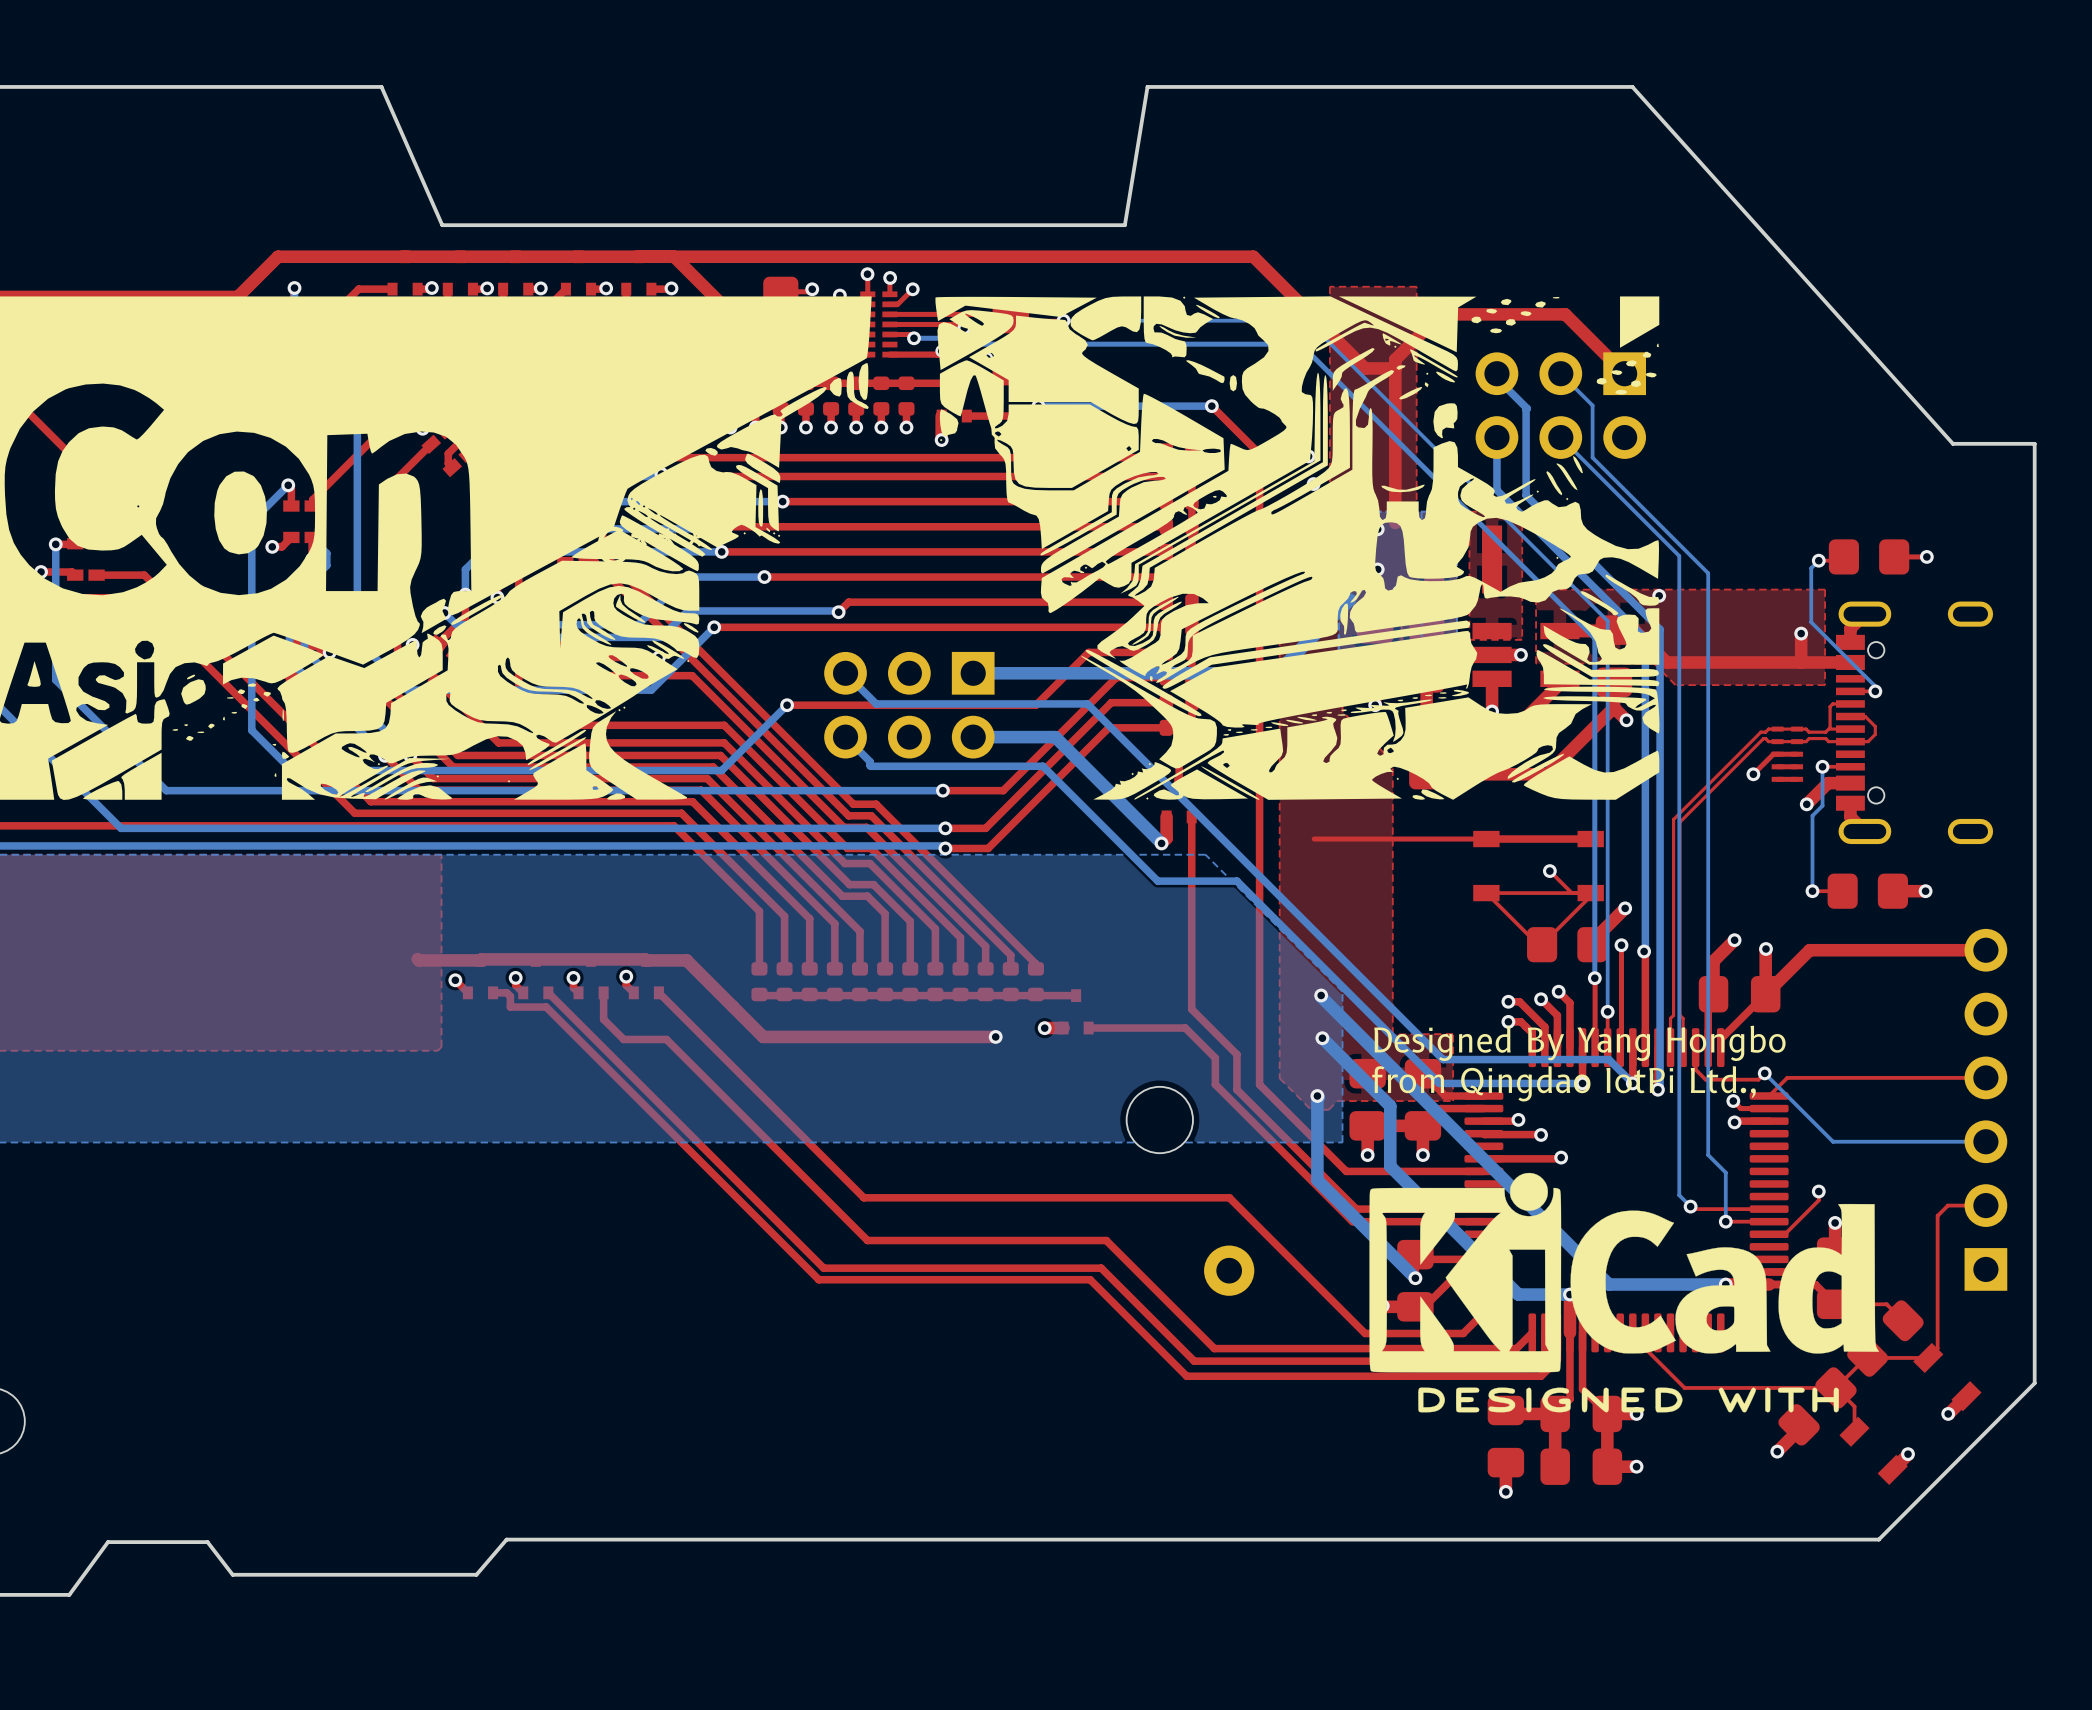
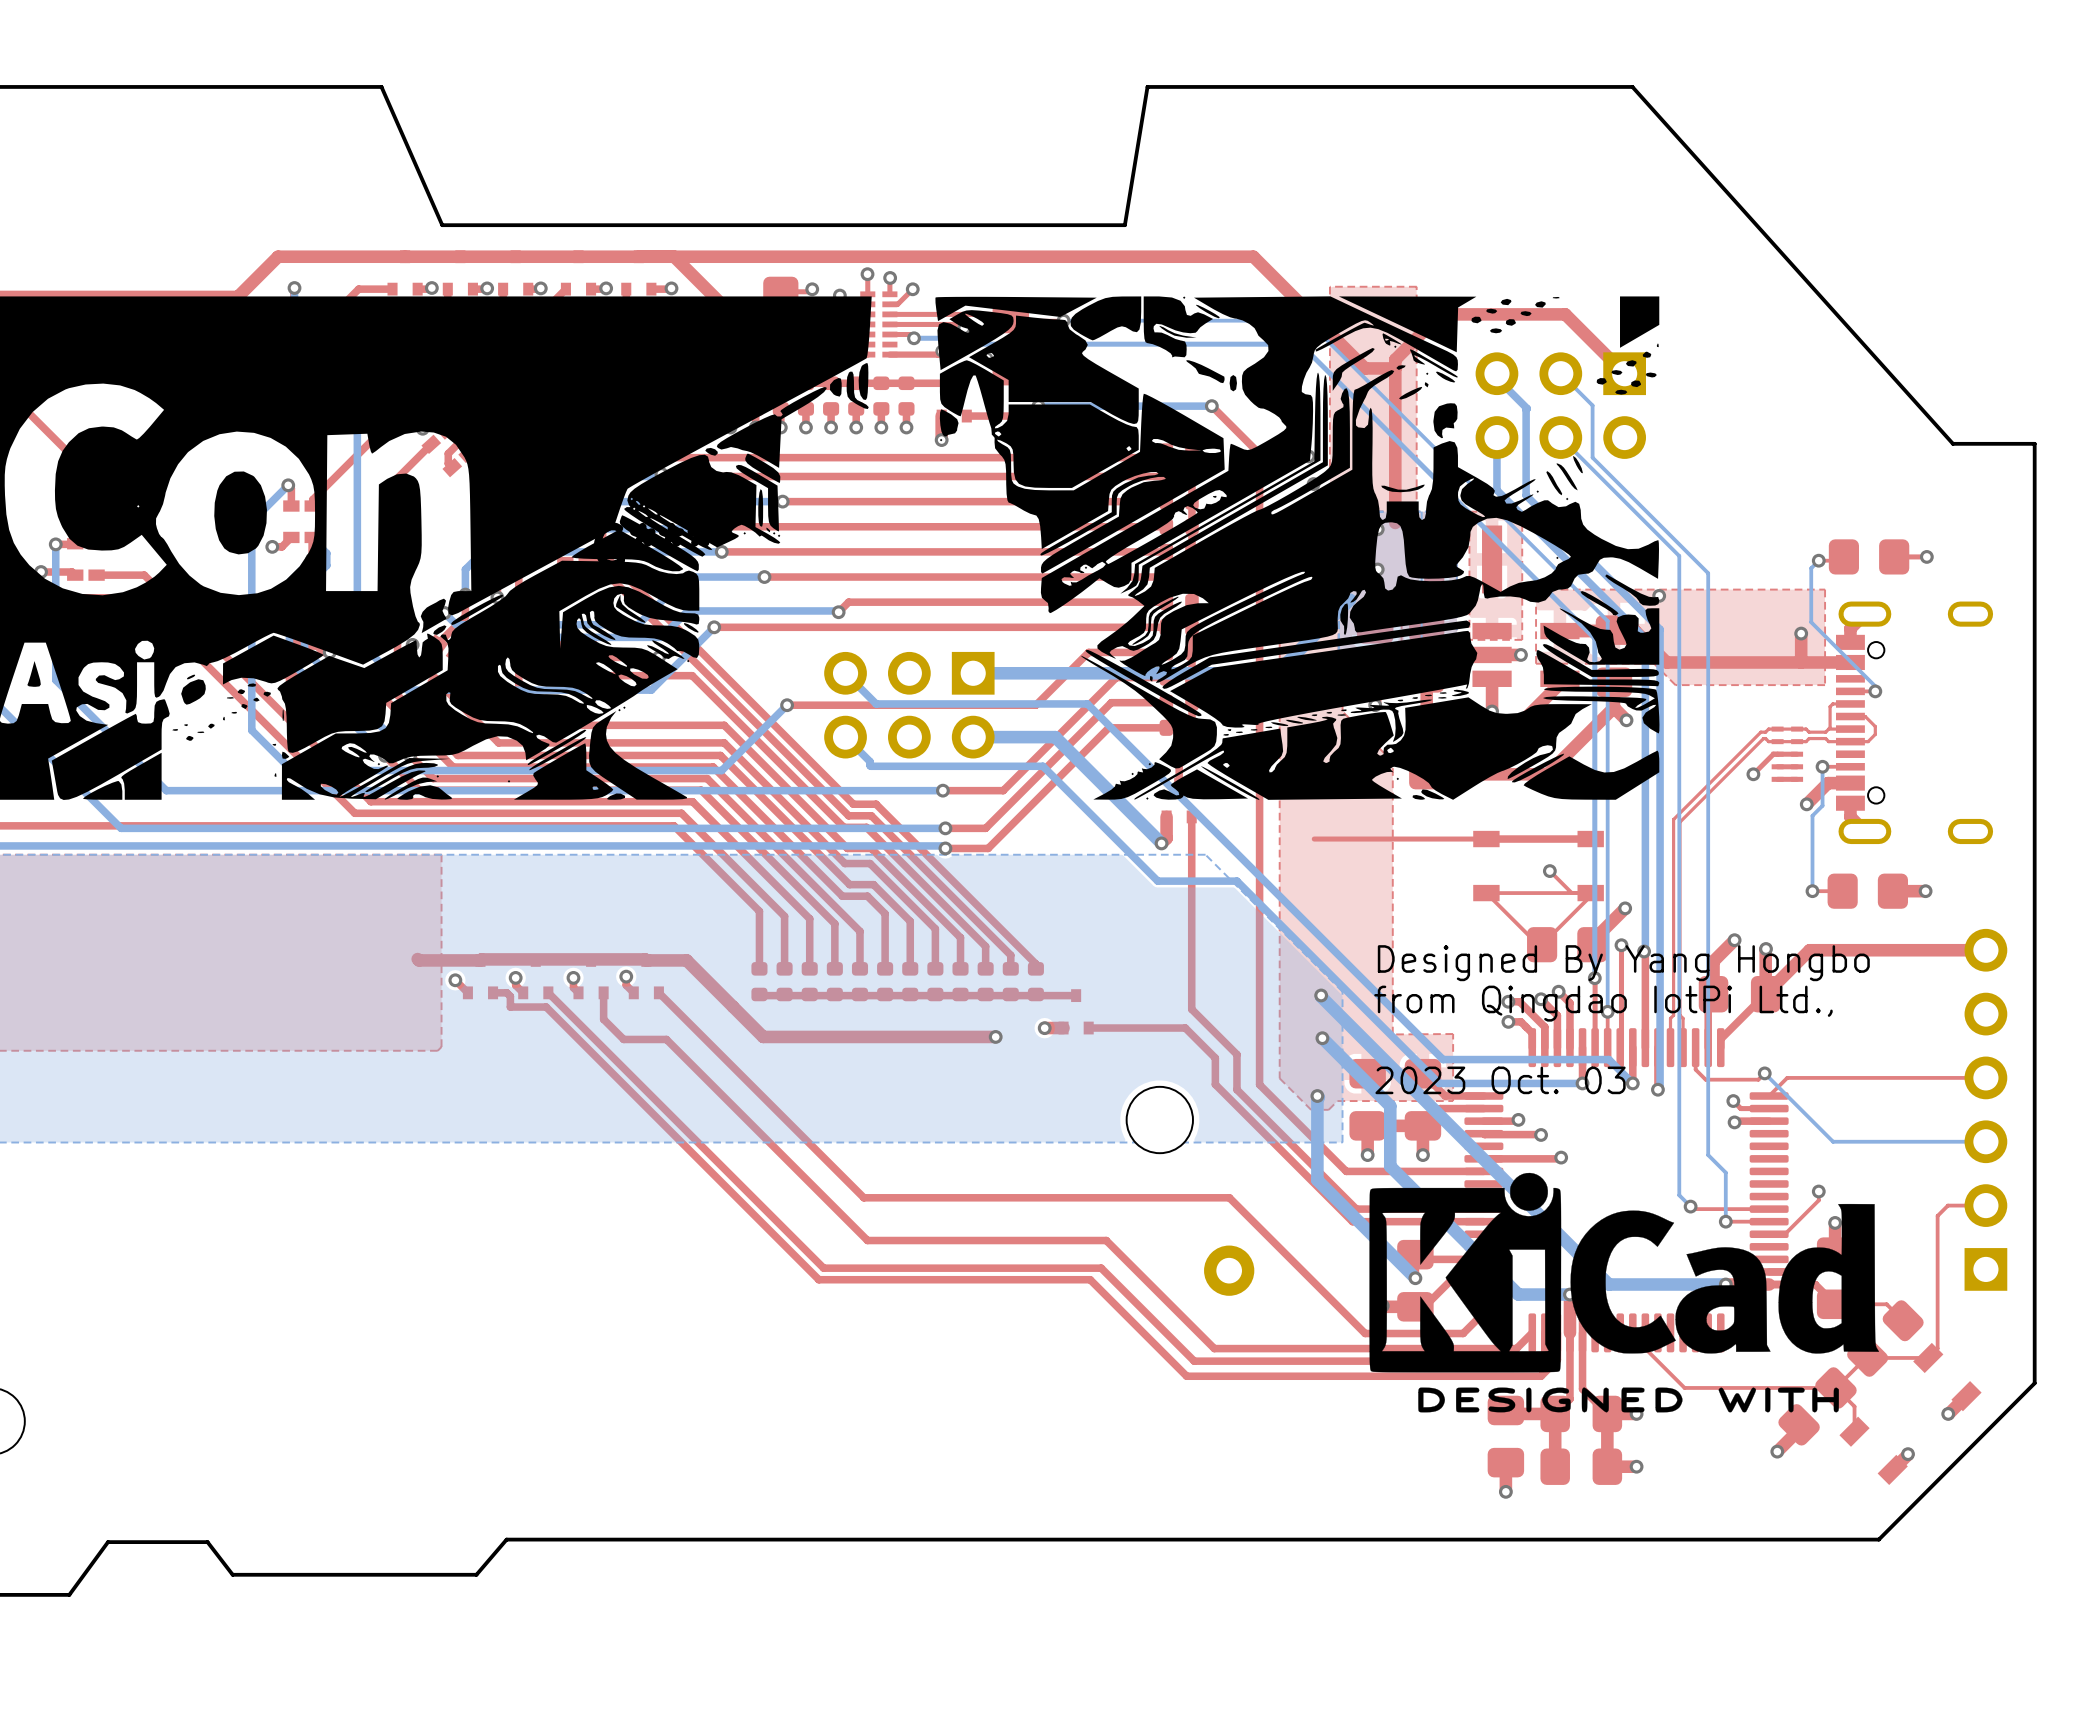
text: none -> from Qingdao IotPi Ltd., (1603, 1003)
text position: Designed By Yang Hongbo (1579, 1043) -> Designed By Yang Hongbo (1623, 963)
text: from Qingdao IotPi Ltd., (1564, 1083) -> 2023 Oct. 03 (1500, 1080)

